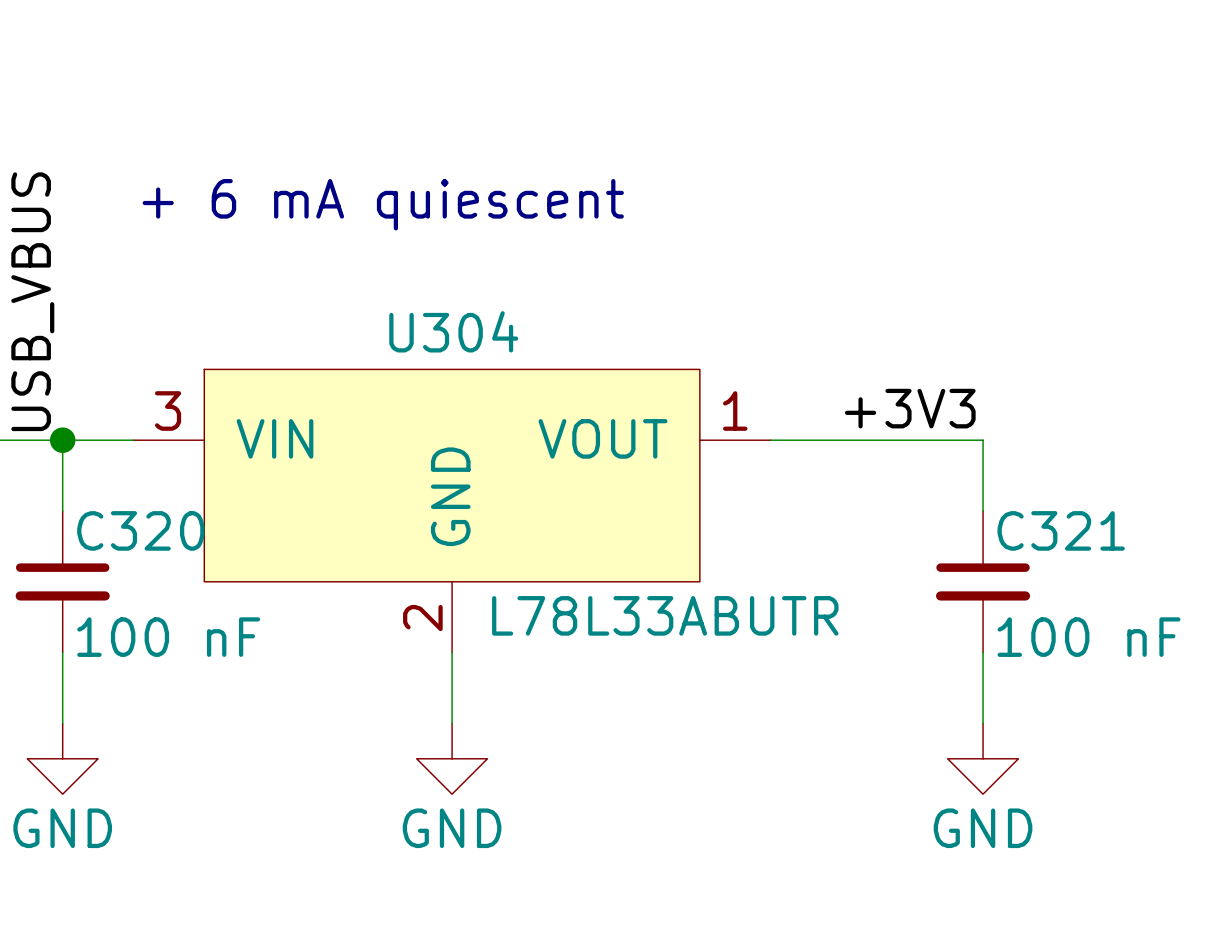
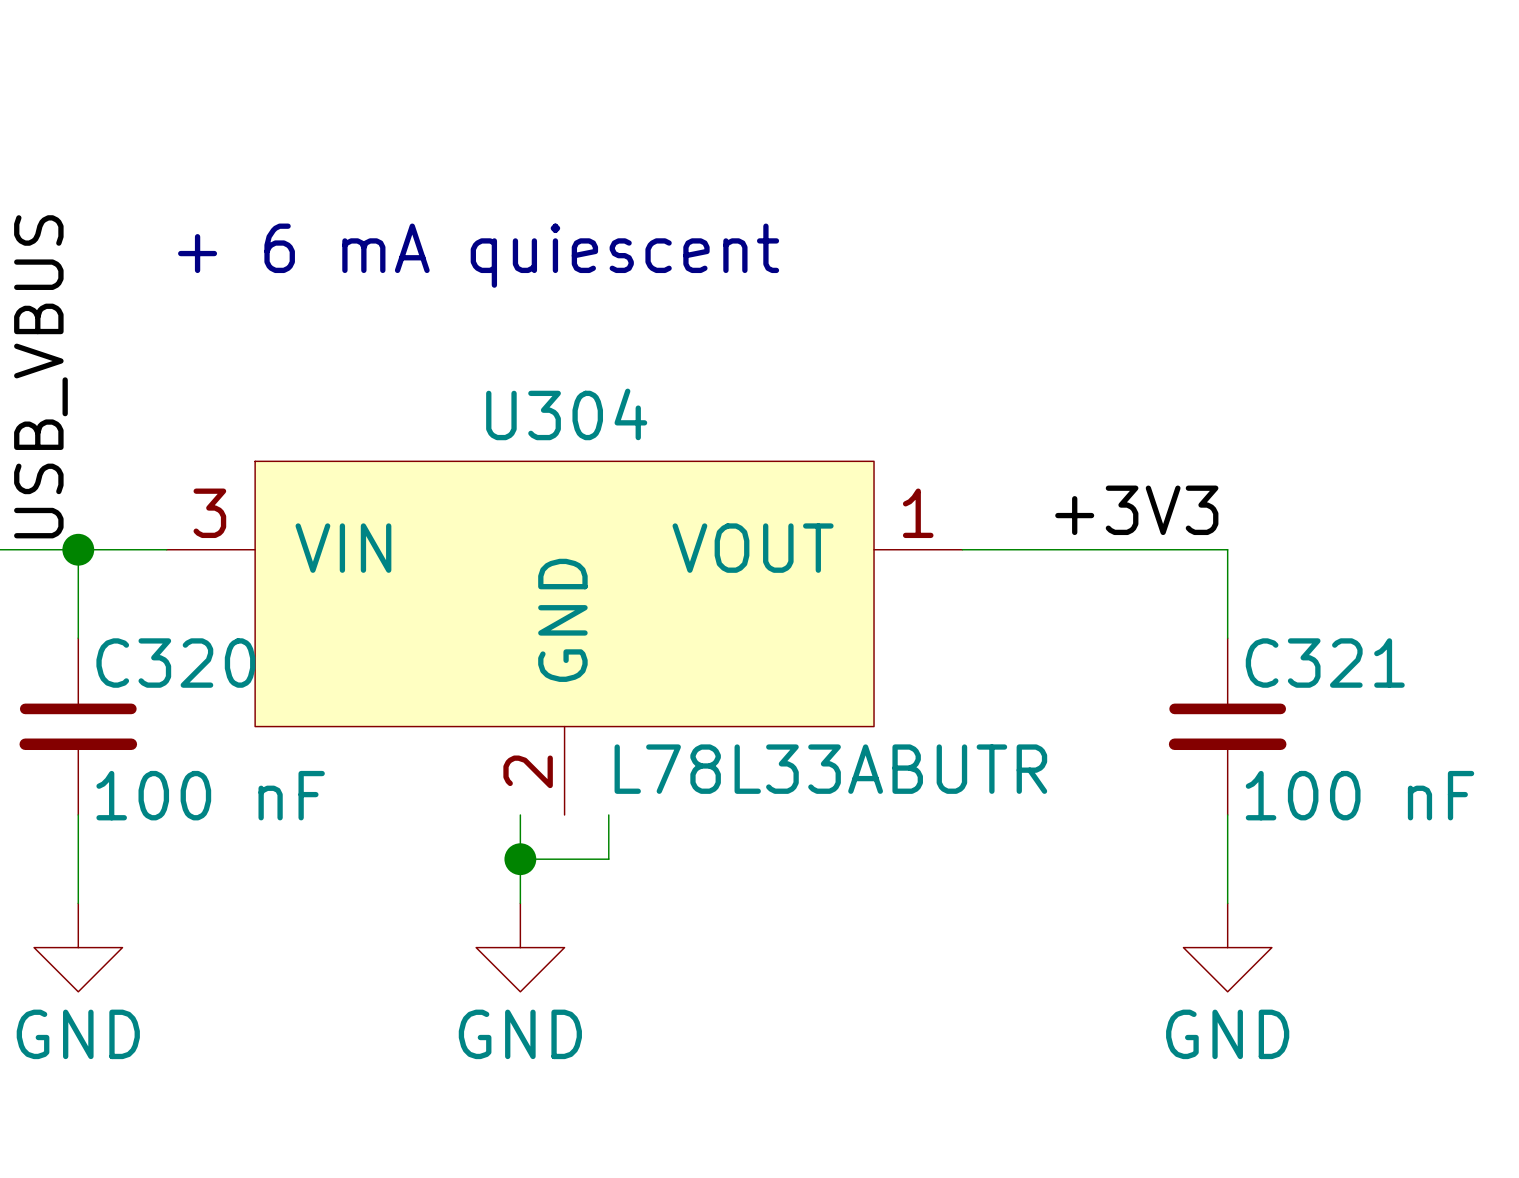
wire: (452, 652) (452, 723) -> (520, 814) (520, 903)
wire: none -> (608, 814) (608, 859) (520, 859)
junction: none -> (520, 859)
power symbol position: GND (452, 758) -> GND (520, 947)

